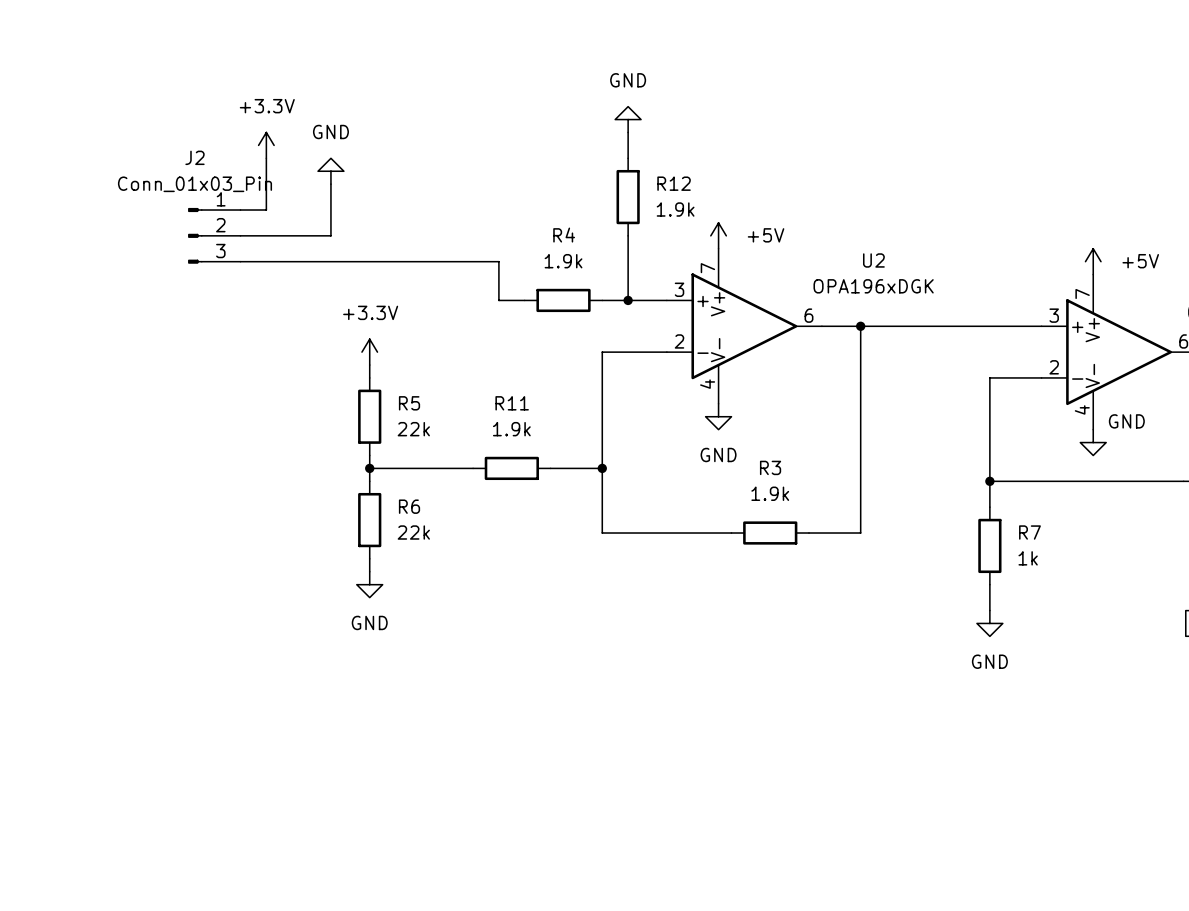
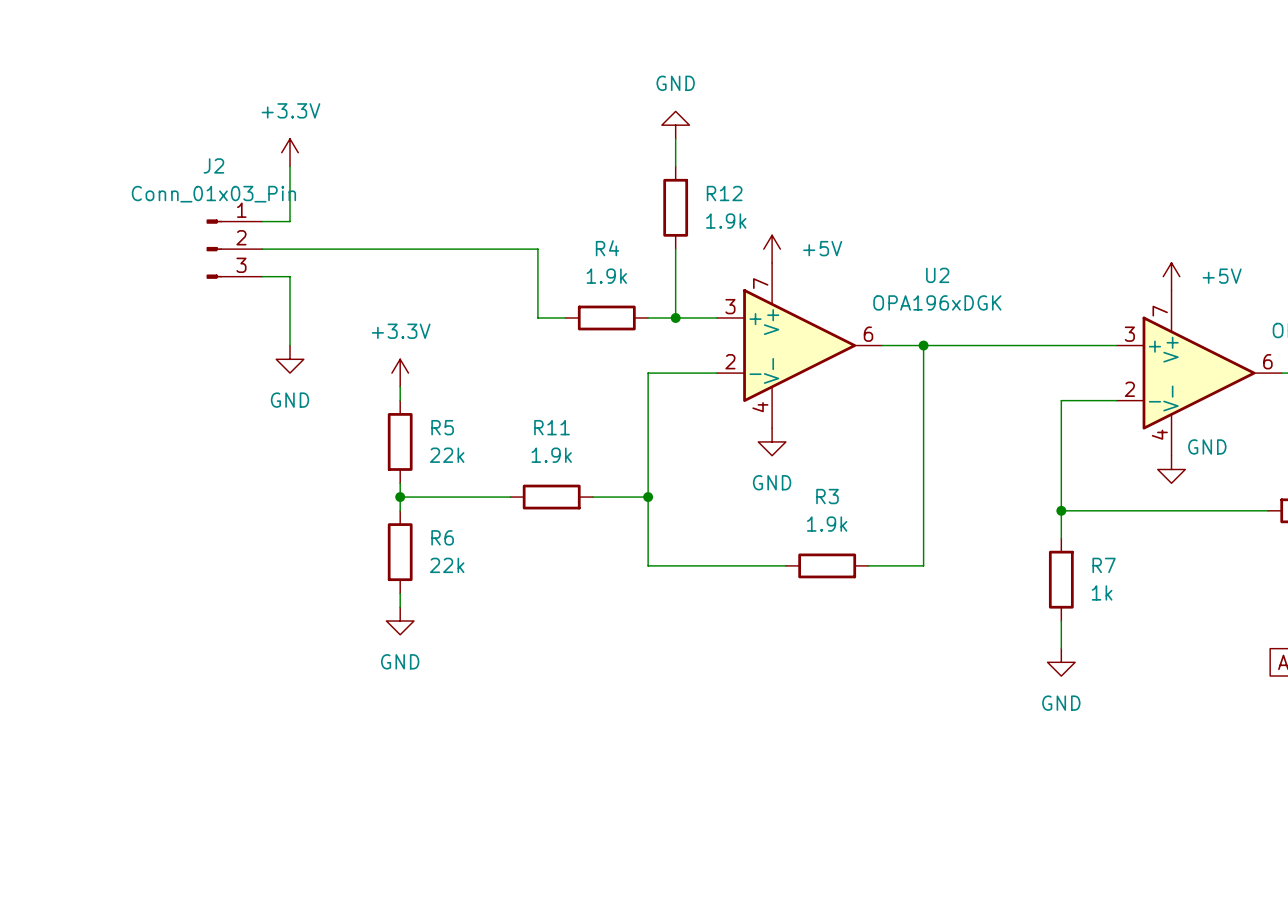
power symbol rotation: 0° (330, 171) -> 180° (290, 359)
power symbol position: GND (330, 171) -> GND (290, 359)
wire: (330, 184) (330, 235) -> none
wire: (266, 261) (498, 261) -> (358, 249) (537, 249) (537, 276)
wire: none -> (290, 276) (290, 345)

